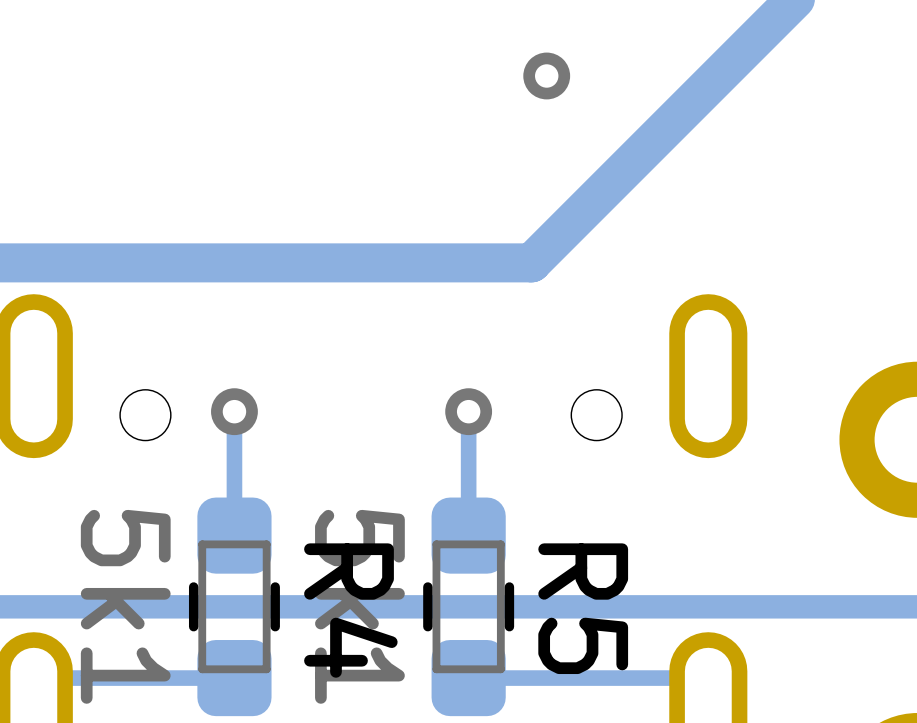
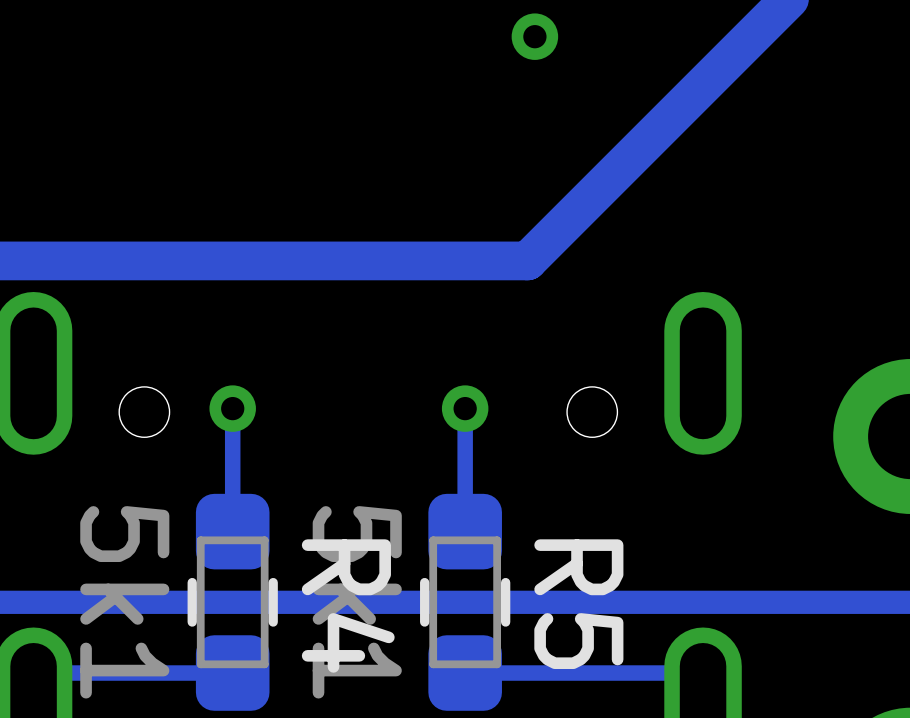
via position: (546, 75) -> (534, 36)

